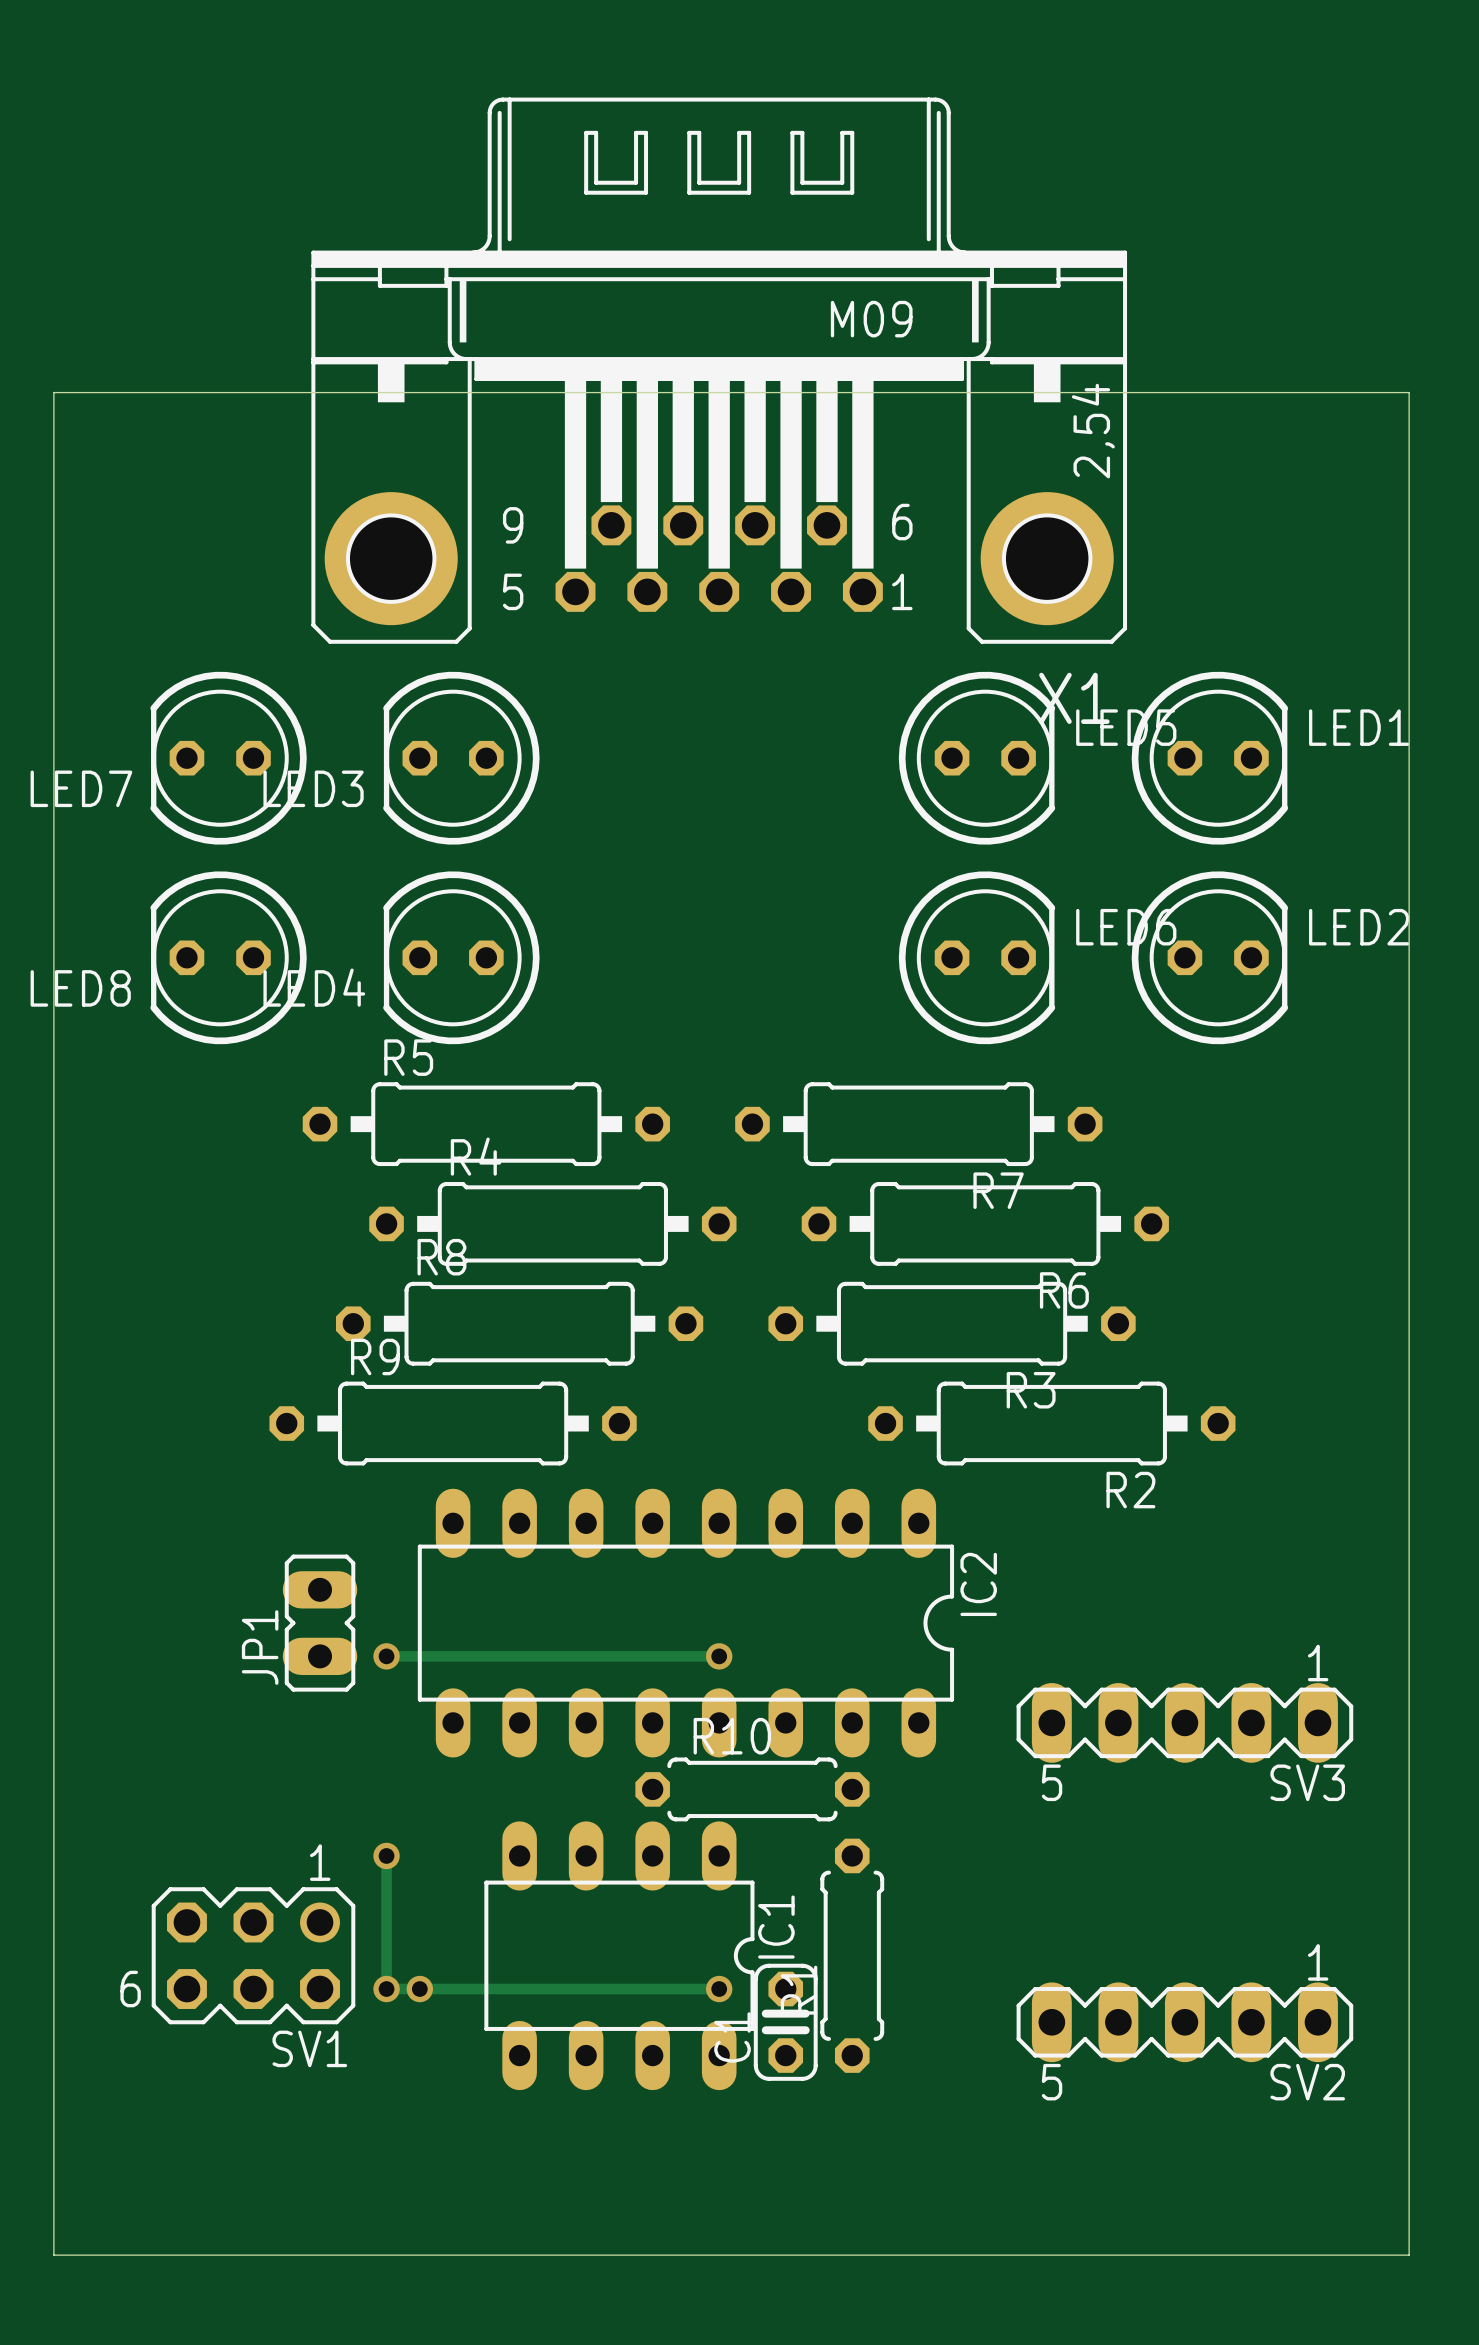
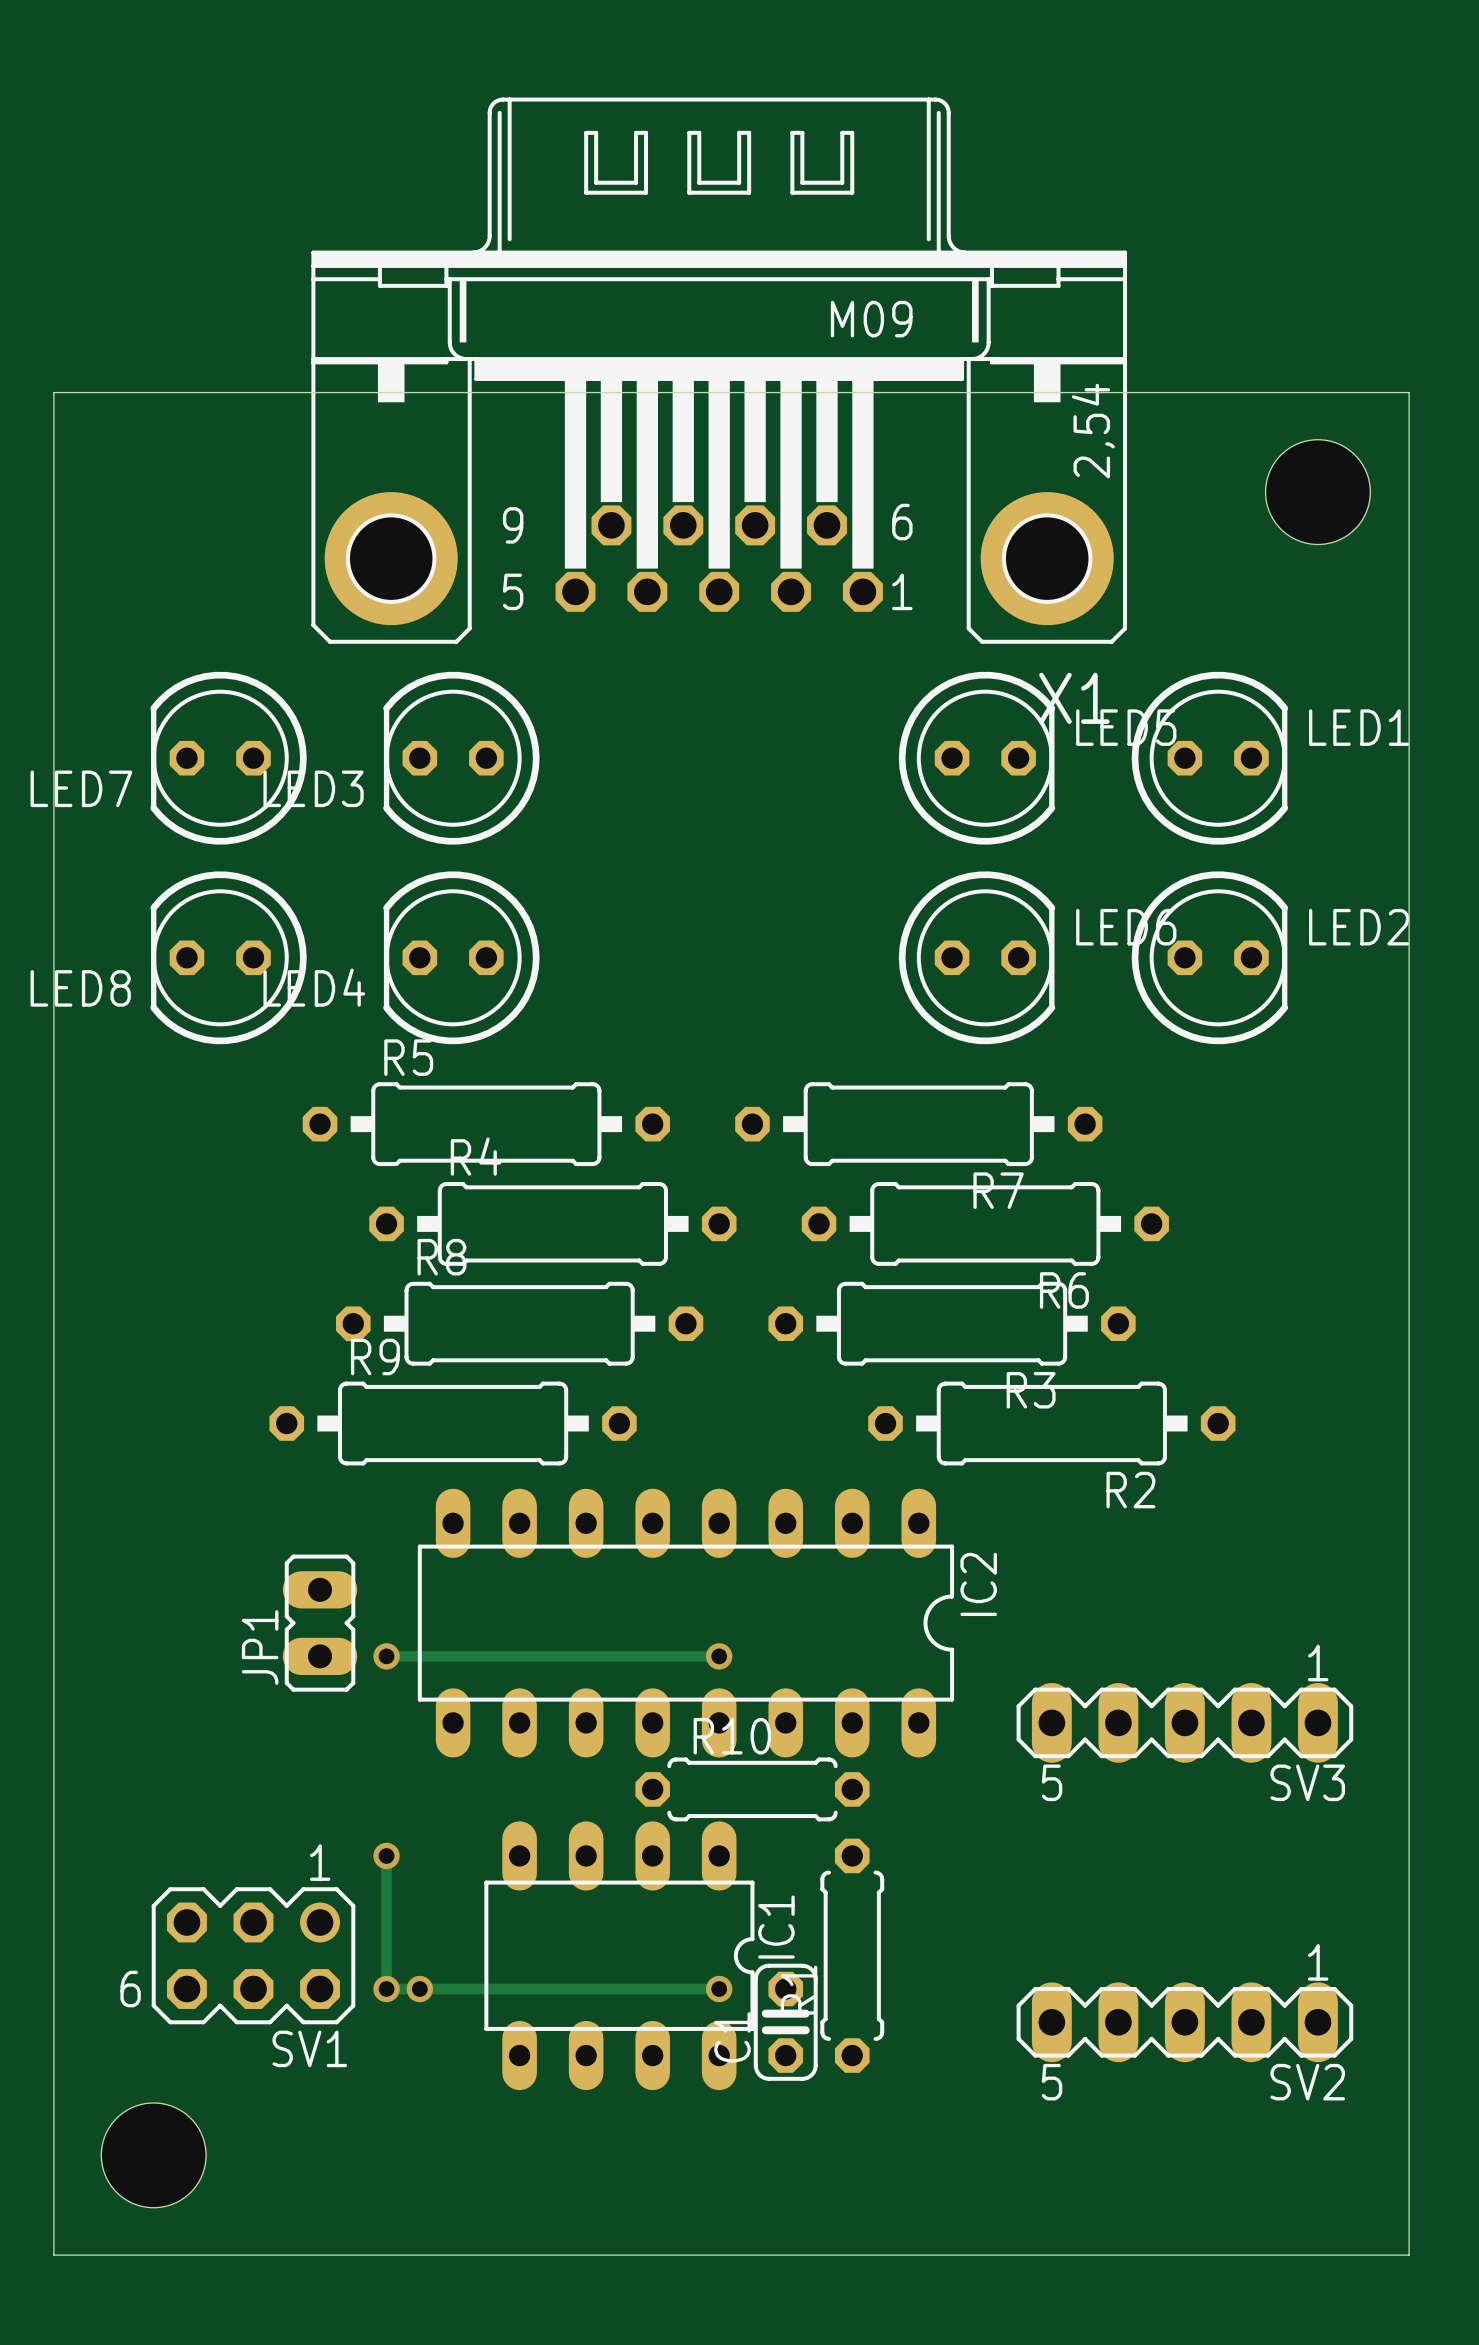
hole: none -> (1317, 492)
hole: none -> (153, 2155)

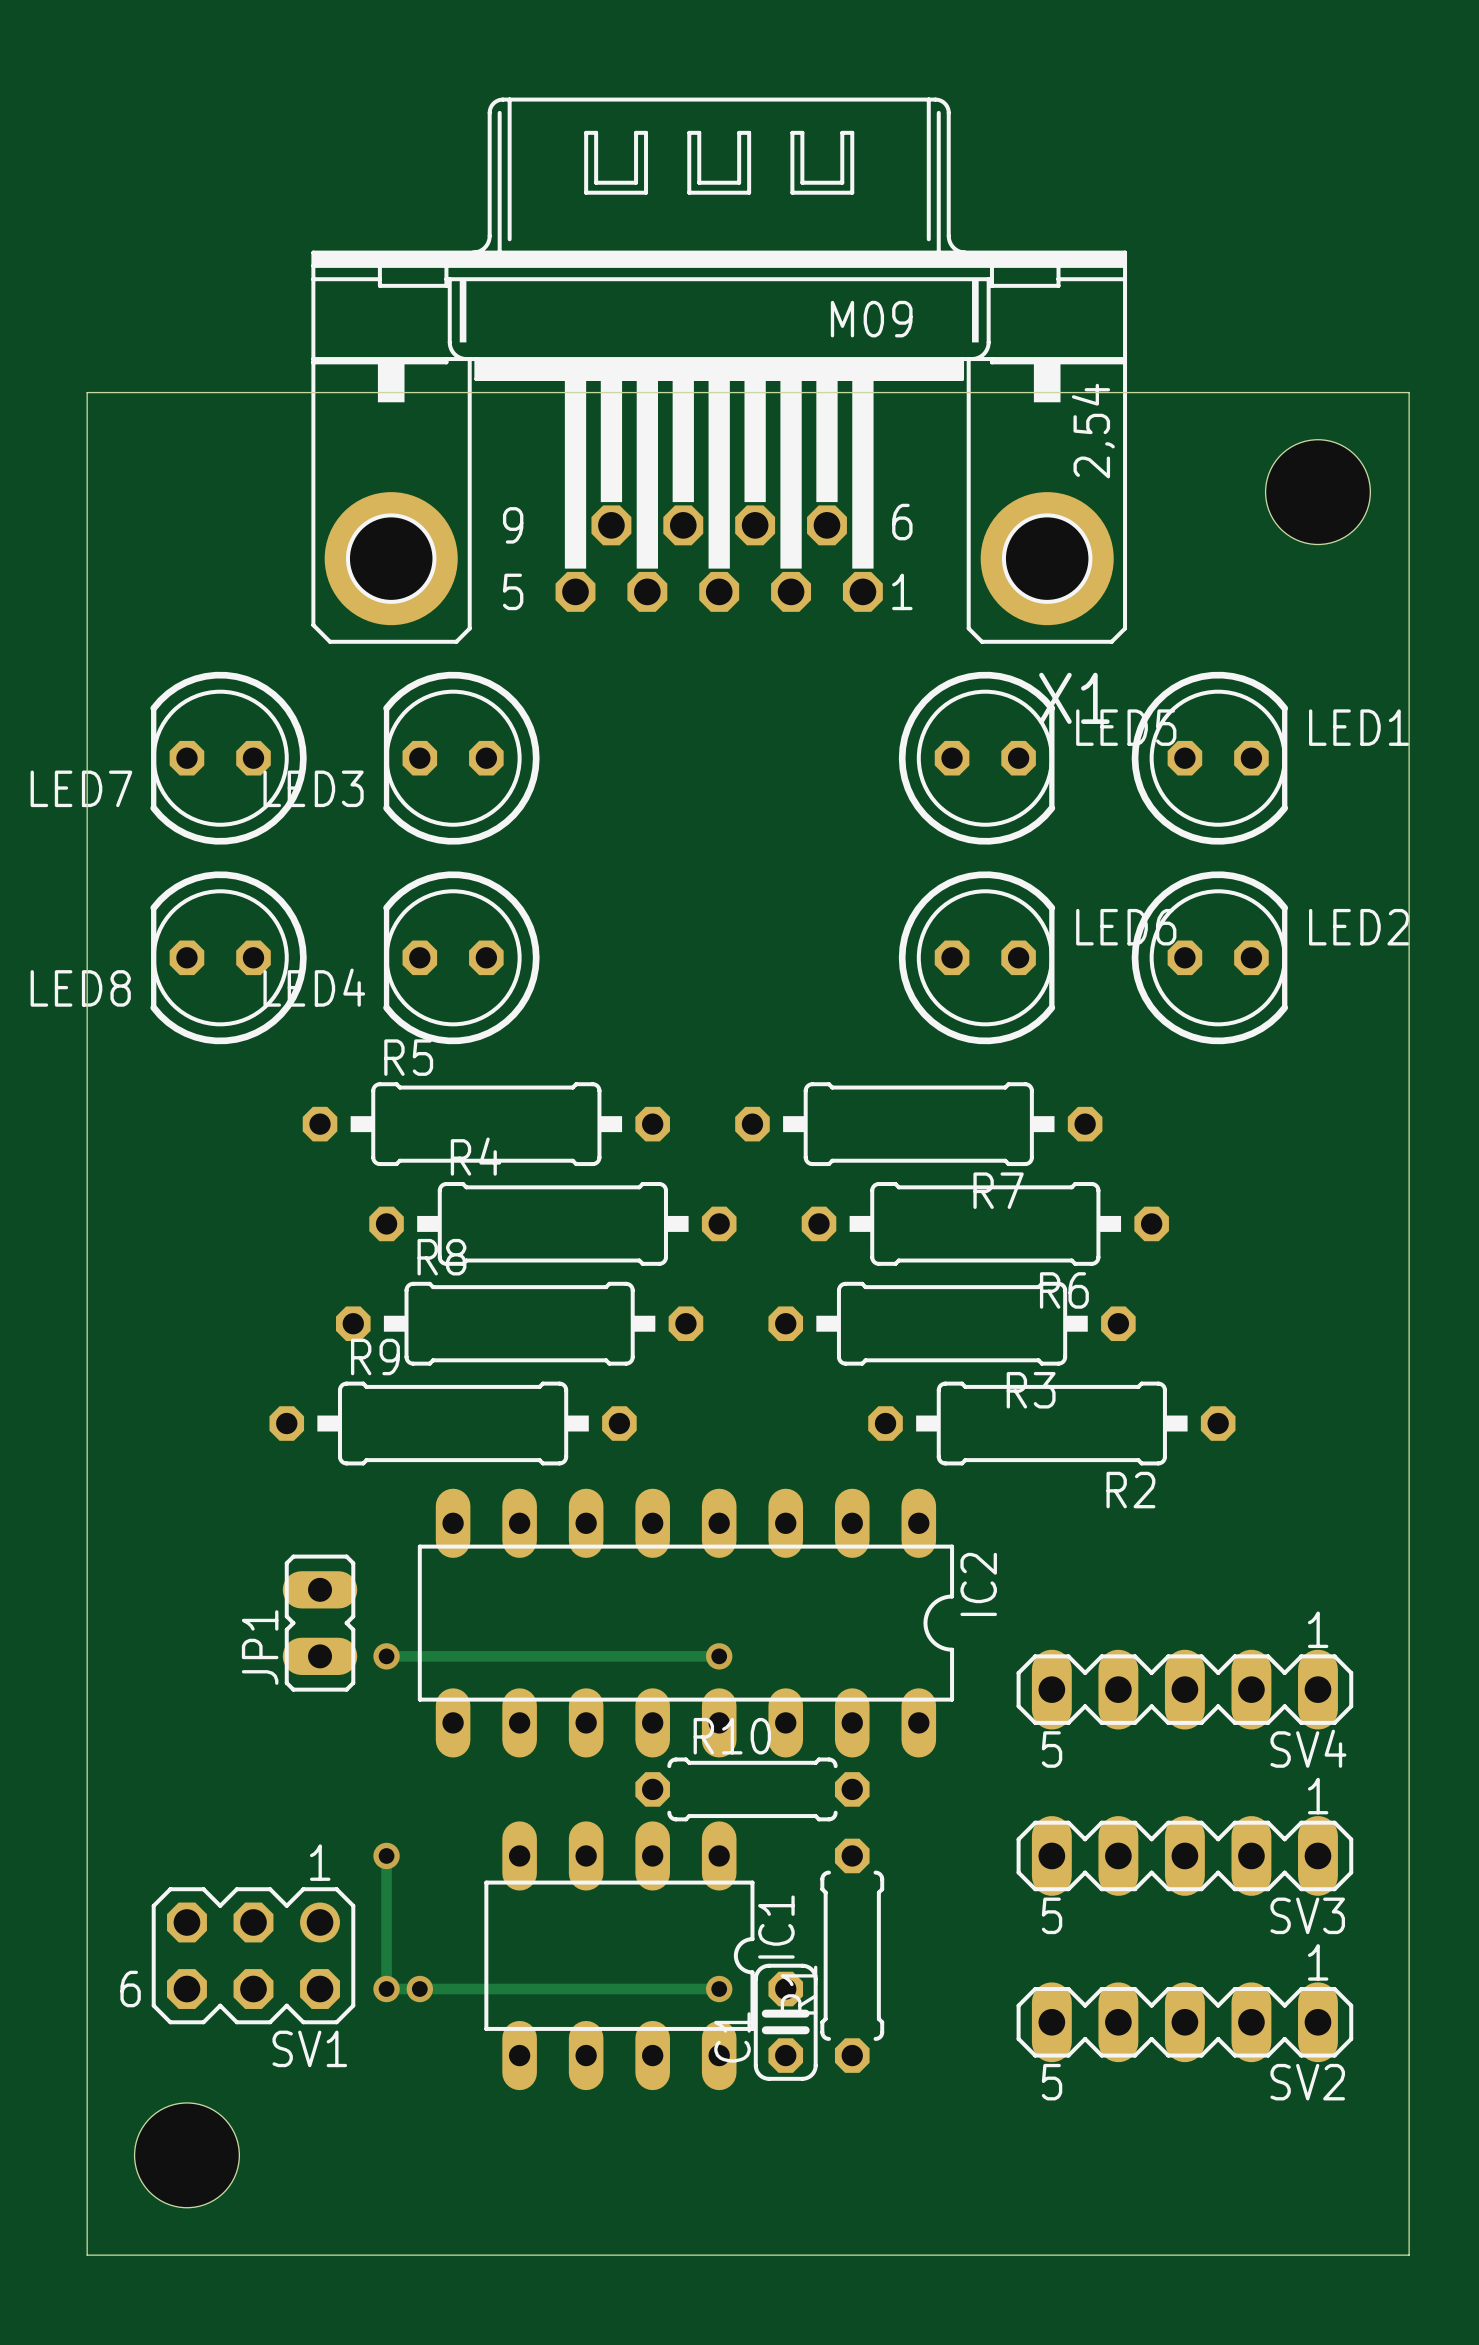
board edge: (87, 392) (53, 392) (53, 2255) (87, 2255) -> (87, 392) (87, 2255)
SV4: none -> (1184, 1689)
SV3 position: (1184, 1722) -> (1184, 1855)
hole position: (153, 2155) -> (186, 2155)

